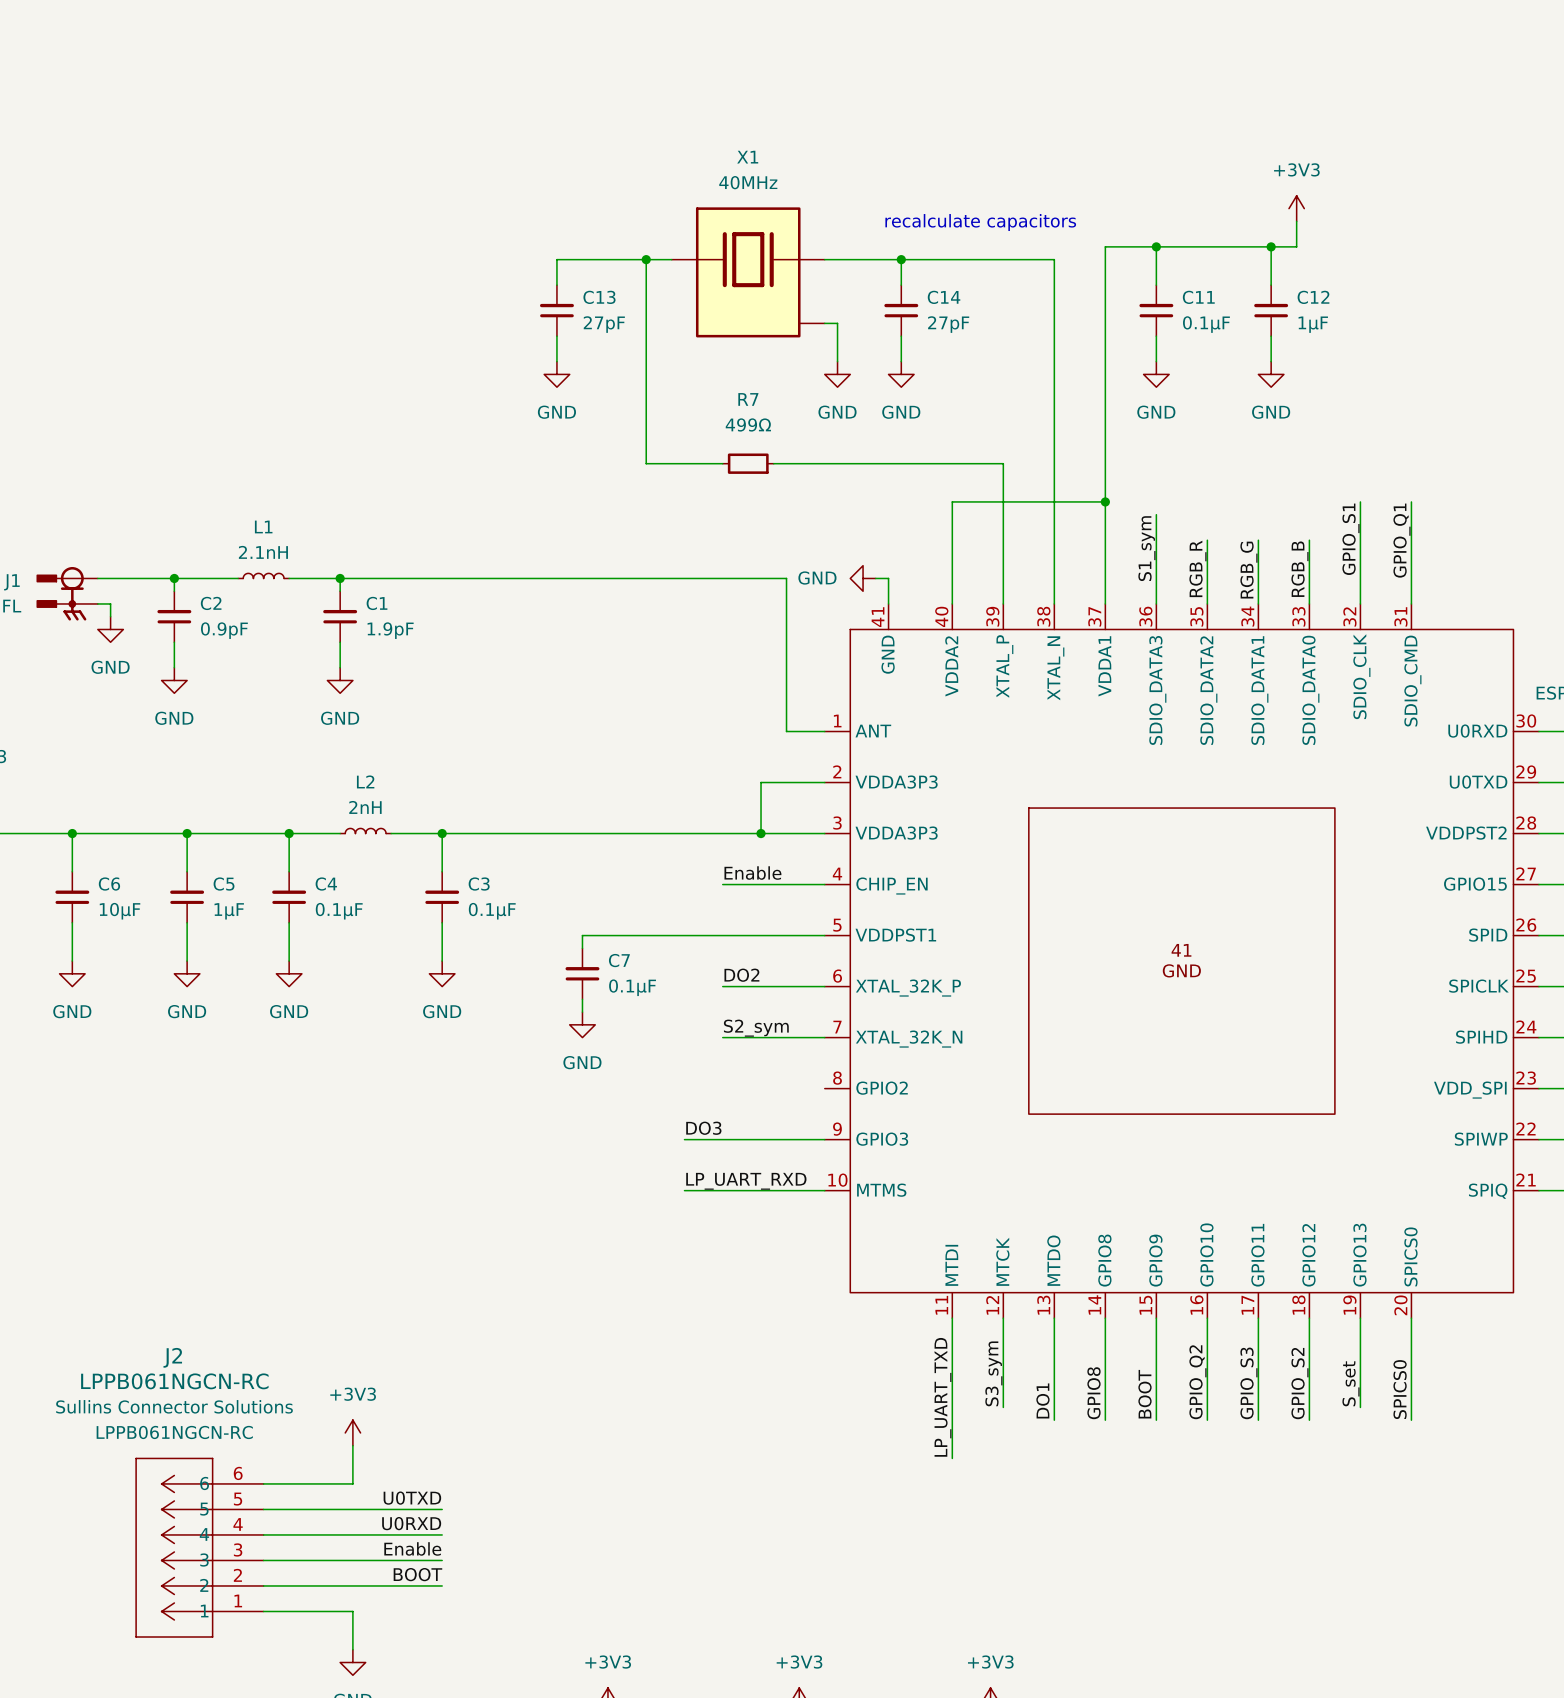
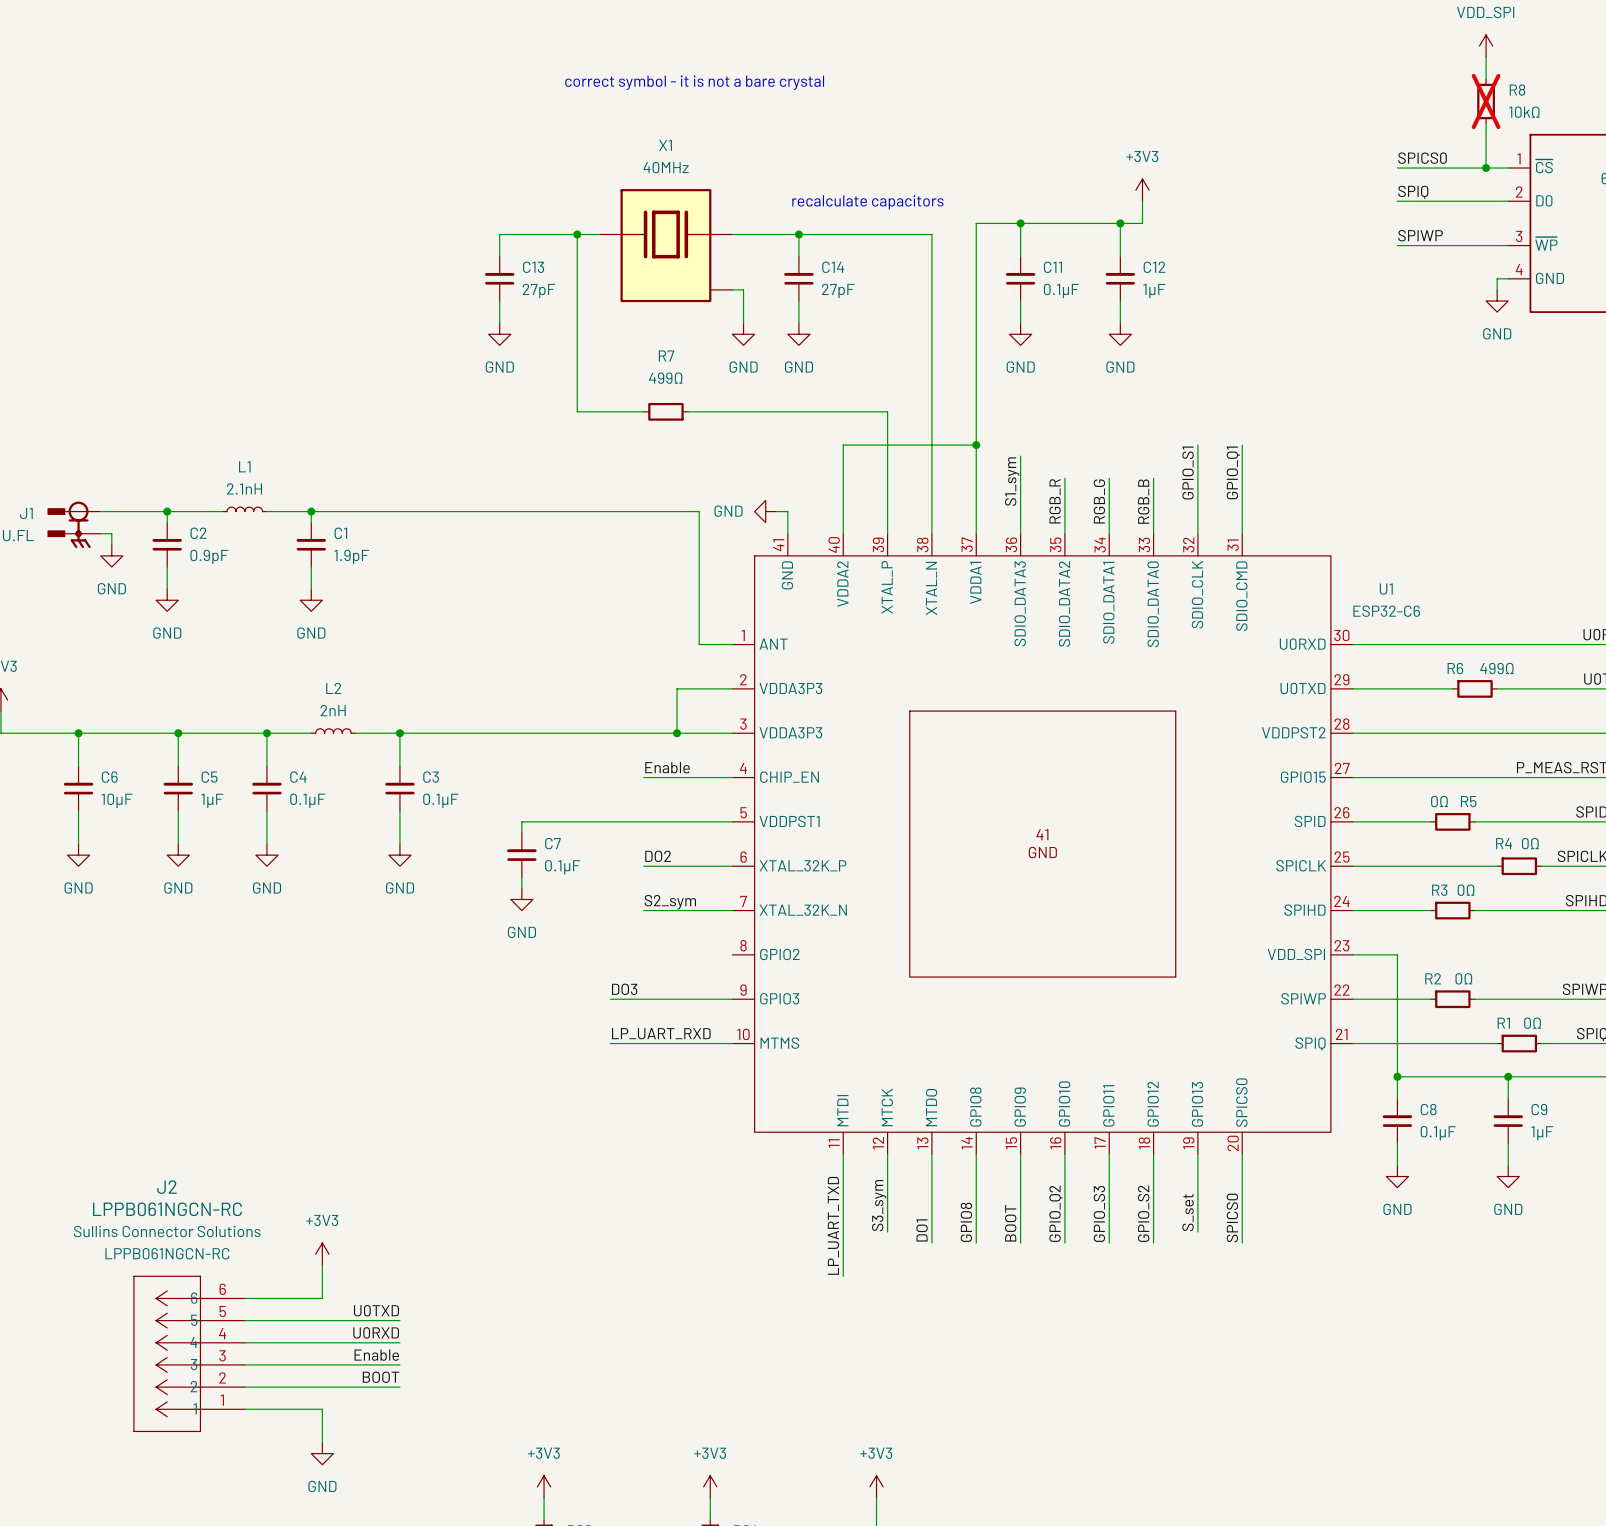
text: none -> correct symbol - it is not a bare crystal (694, 82)

